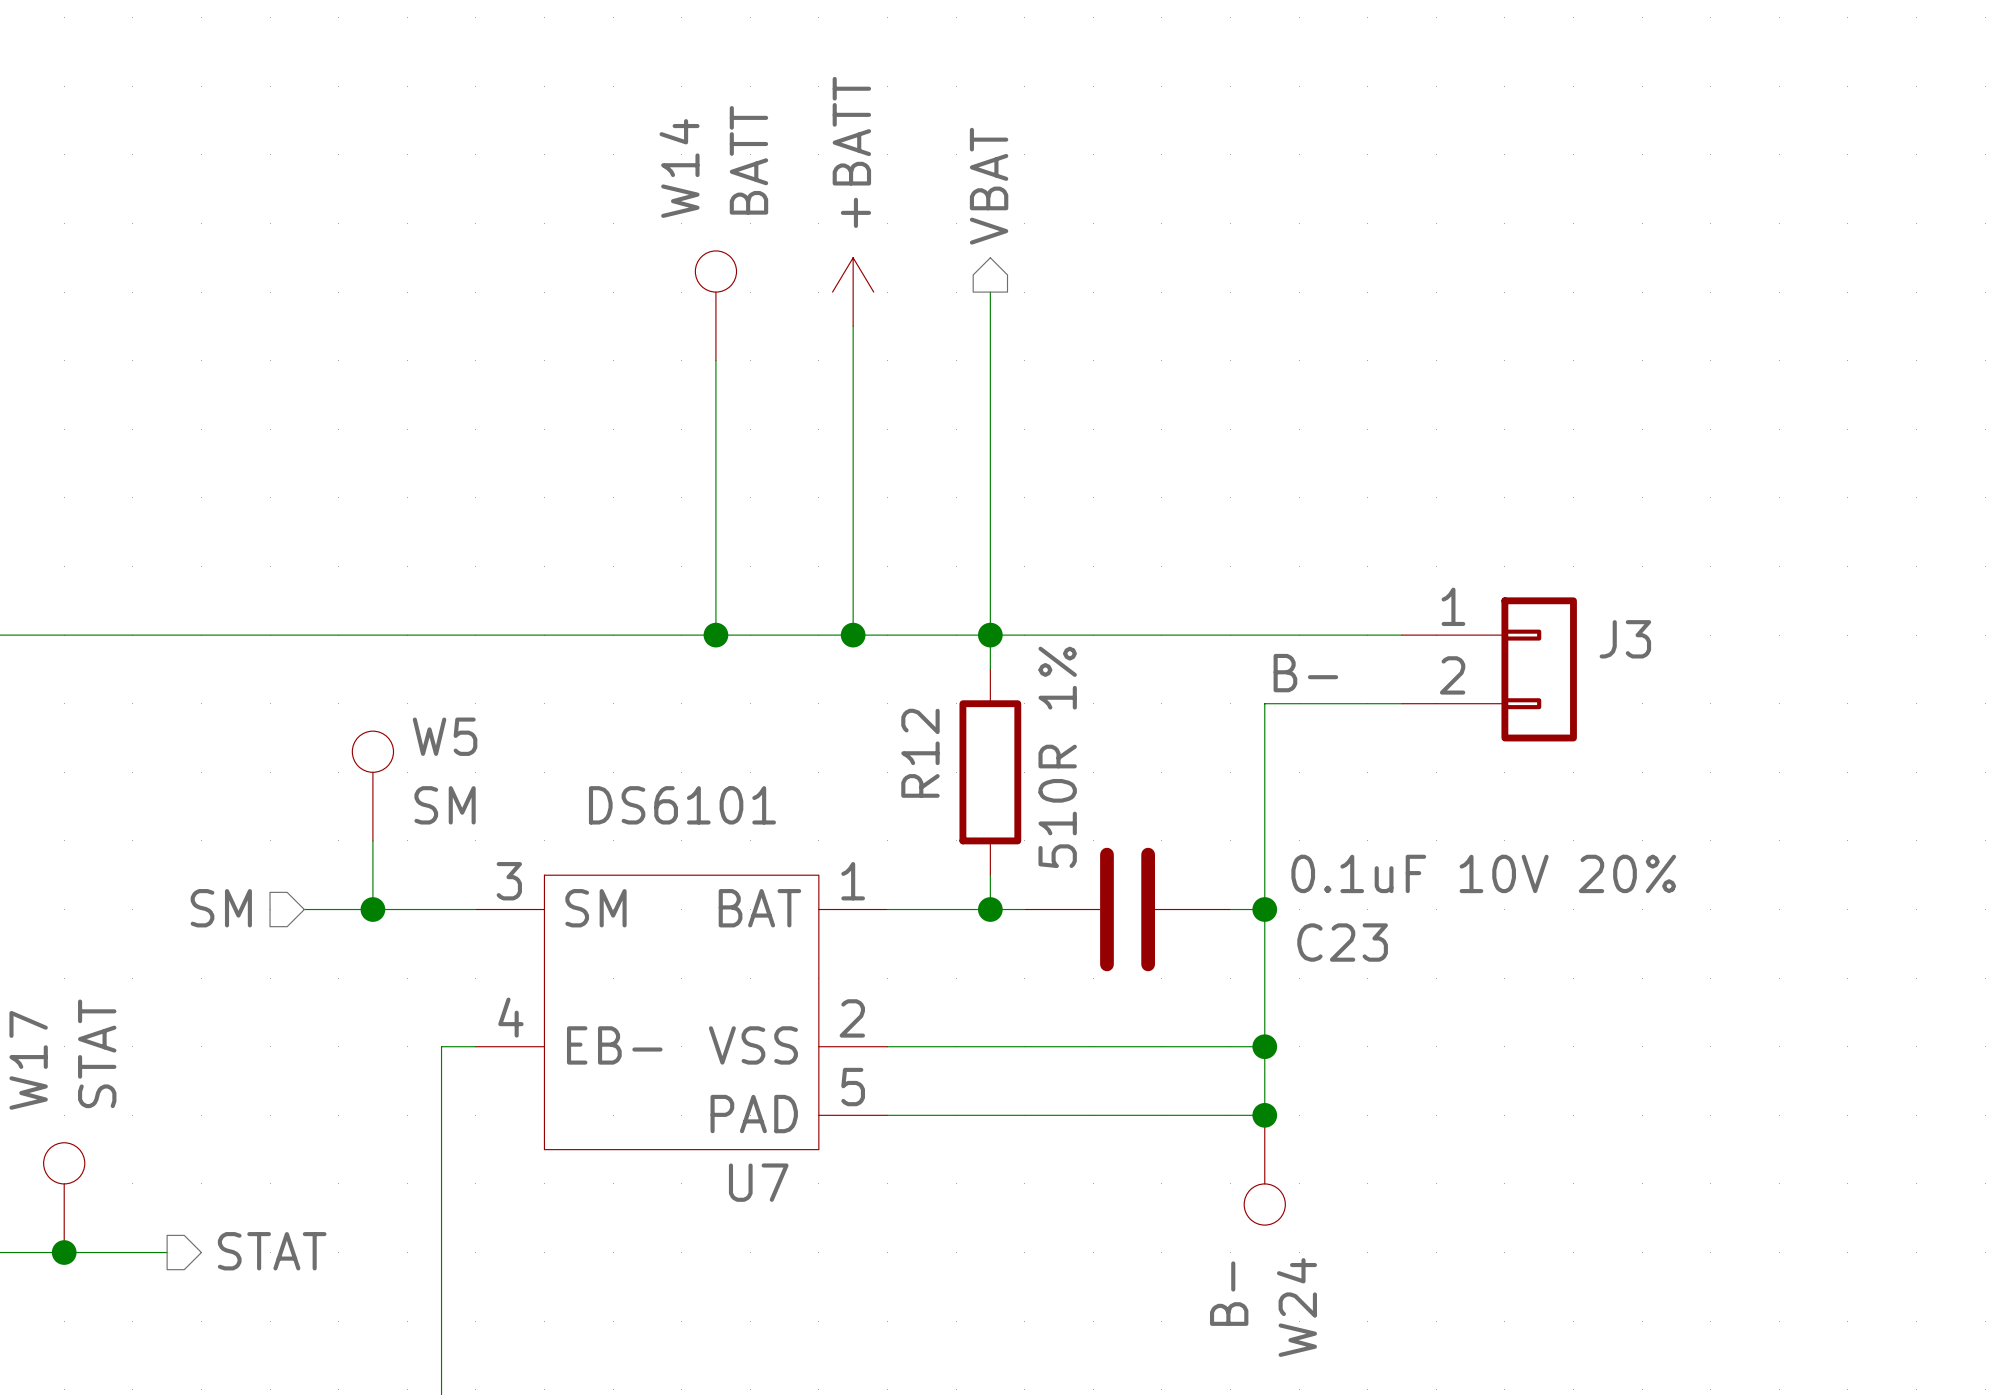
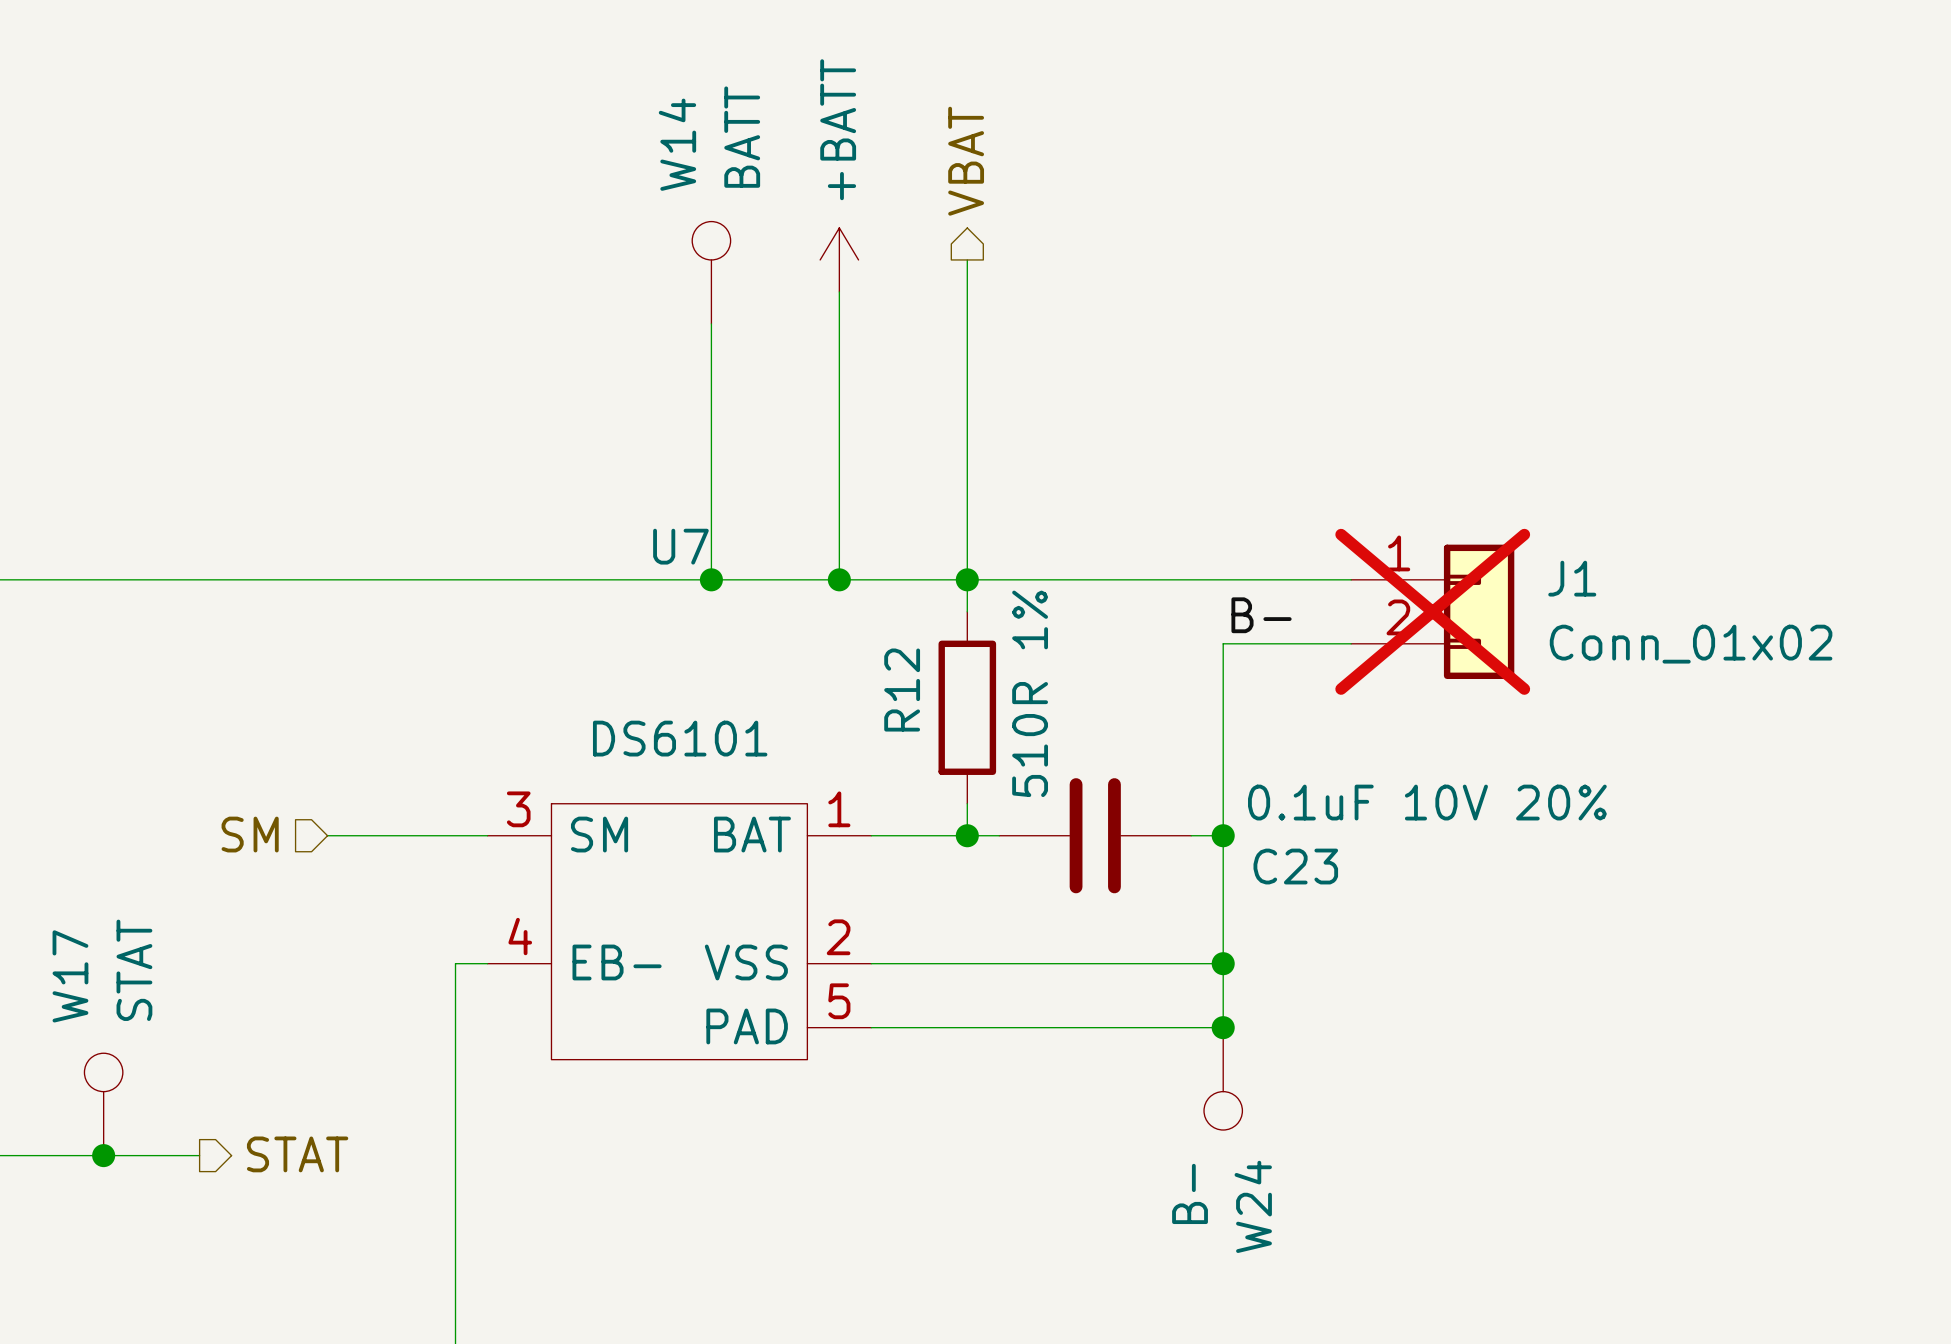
J3 name: J3 (1625, 639) -> J1 (1572, 578)
J3 do-not-place cross: none -> (1432, 611)
J3 value: none -> Conn_01x02 (1691, 644)
W5: SM (372, 786) -> none
wire: (372, 840) (372, 909) -> none
junction: (372, 909) -> none
U7 name position: U7 (758, 1182) -> U7 (680, 546)

